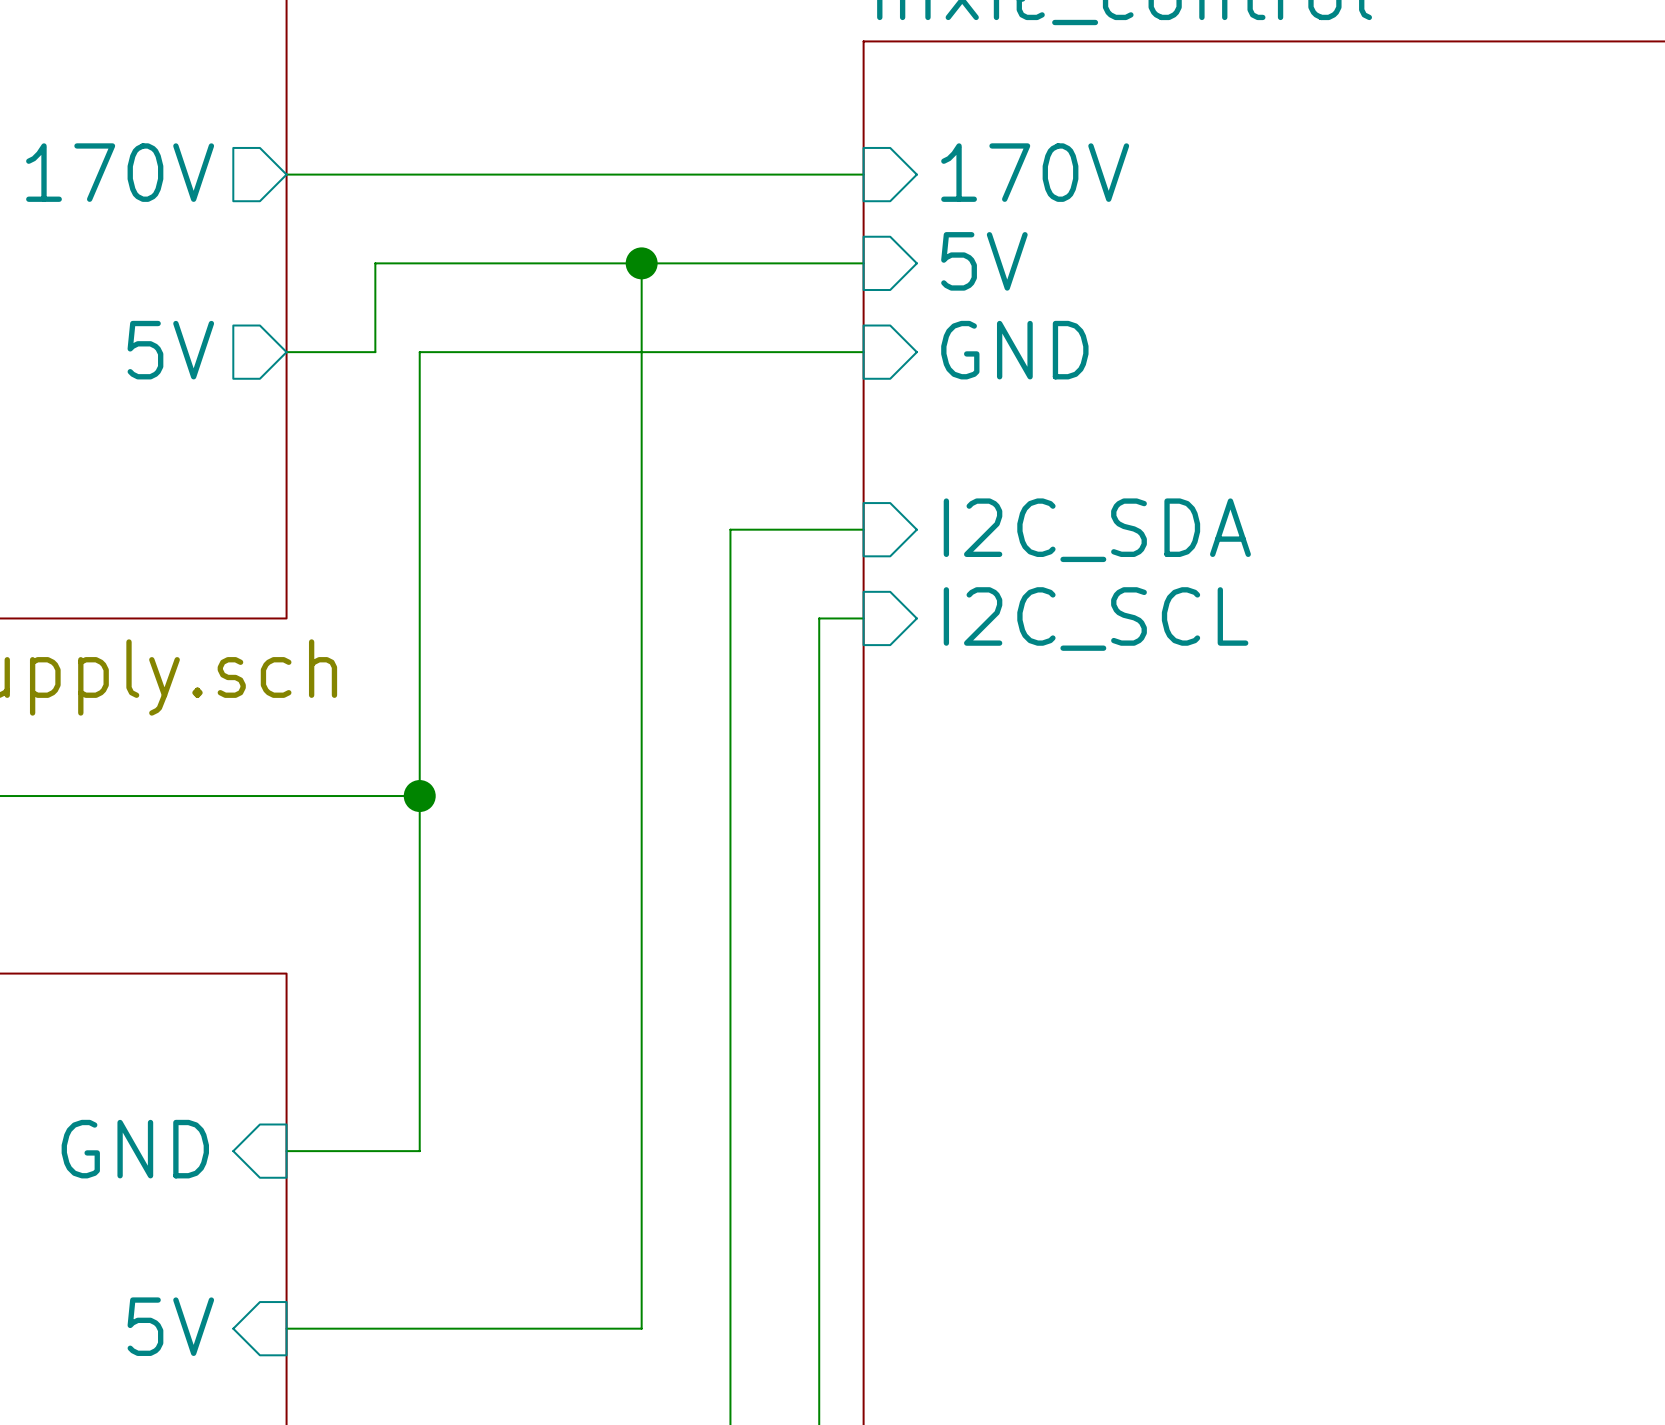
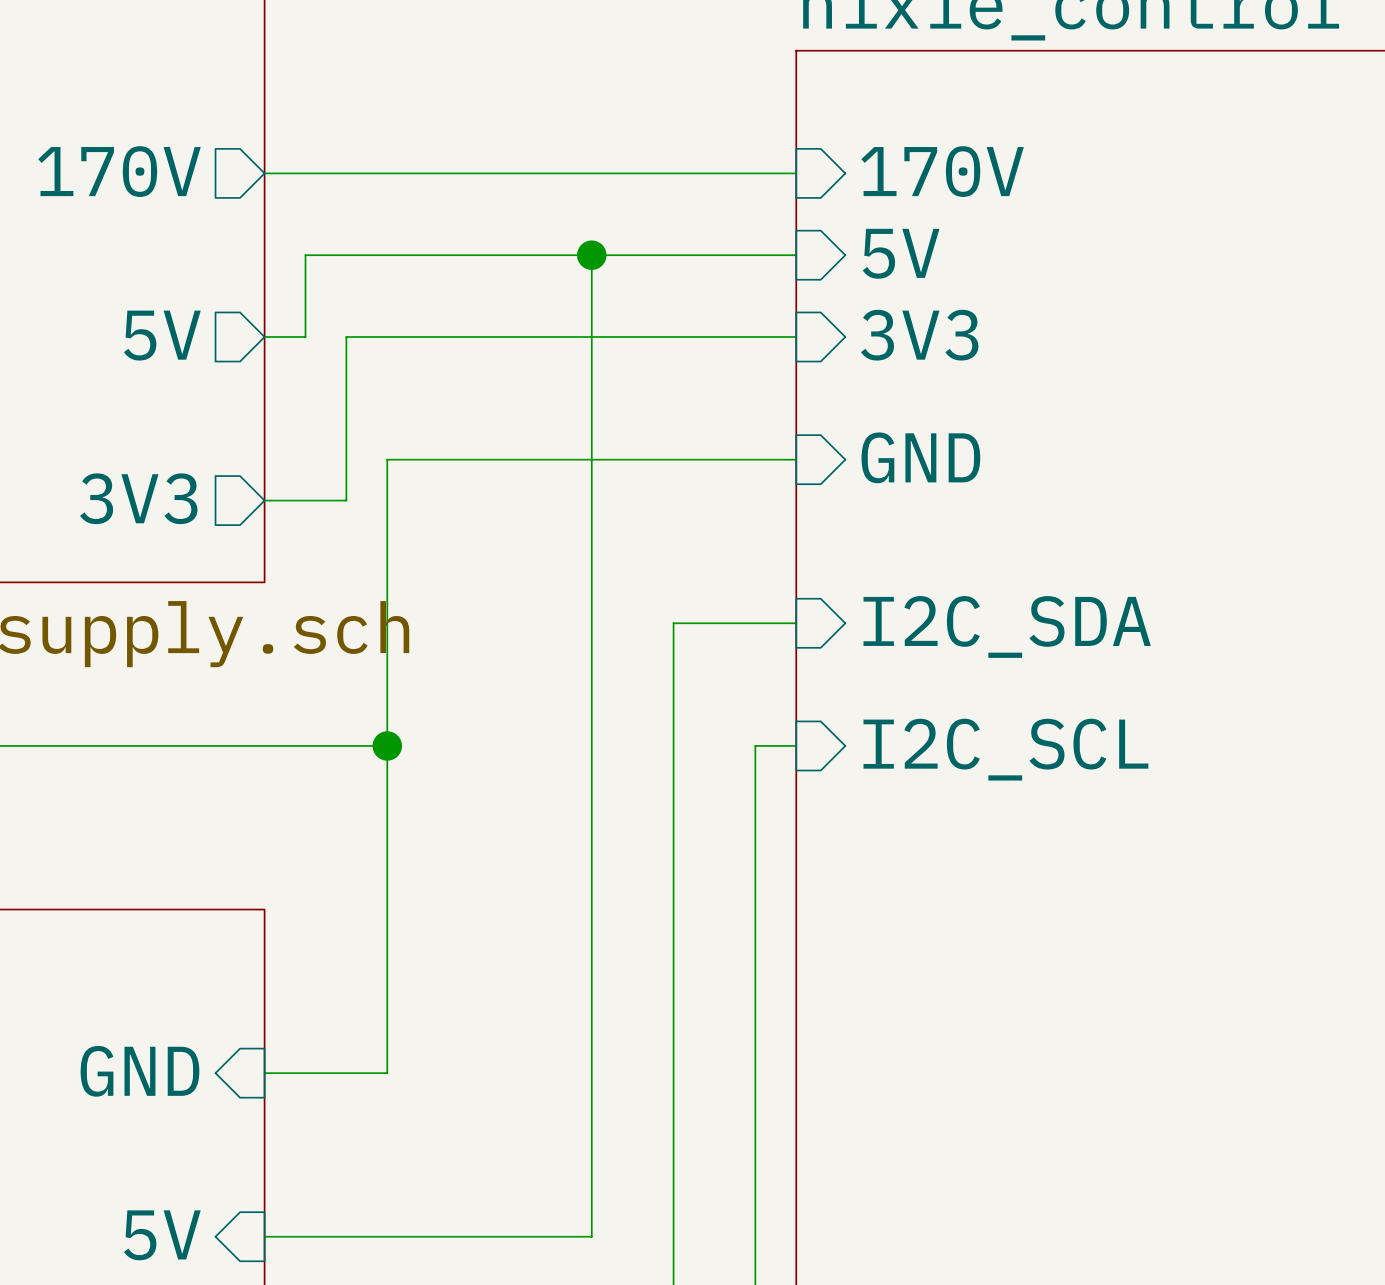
wire: (375, 263) (375, 352) (330, 352) -> (346, 255) (305, 255) (305, 336)
sheet pin: GND (1014, 350) -> 3V3 (919, 335)
wire: (419, 352) (419, 485) -> (387, 336) (346, 336) (346, 500) (264, 500)
sheet pin: none -> GND (920, 457)
wire: none -> (387, 459) (796, 459)
sheet pin: none -> 3V3 (138, 498)
wire: (863, 529) (730, 529) (730, 662) -> (796, 623) (673, 623)
sheet pin position: I2C_SDA (1097, 530) -> I2C_SDA (1007, 626)
wire: (863, 618) (819, 618) (819, 796) -> (796, 745) (755, 745)
sheet pin position: I2C_SCL (1096, 619) -> I2C_SCL (1005, 749)

